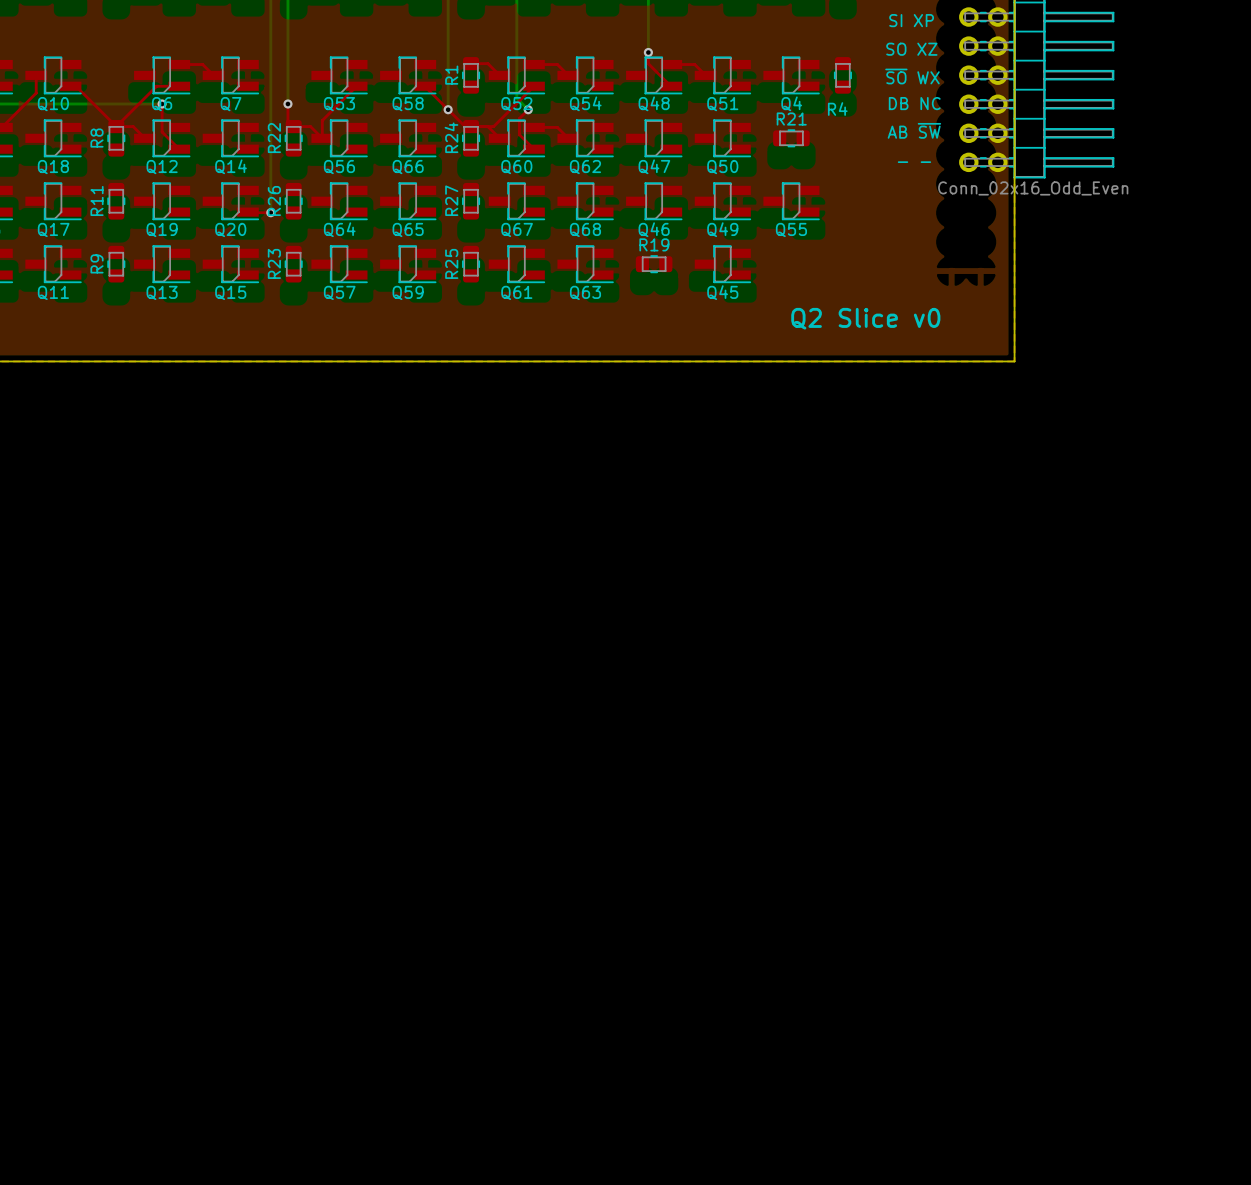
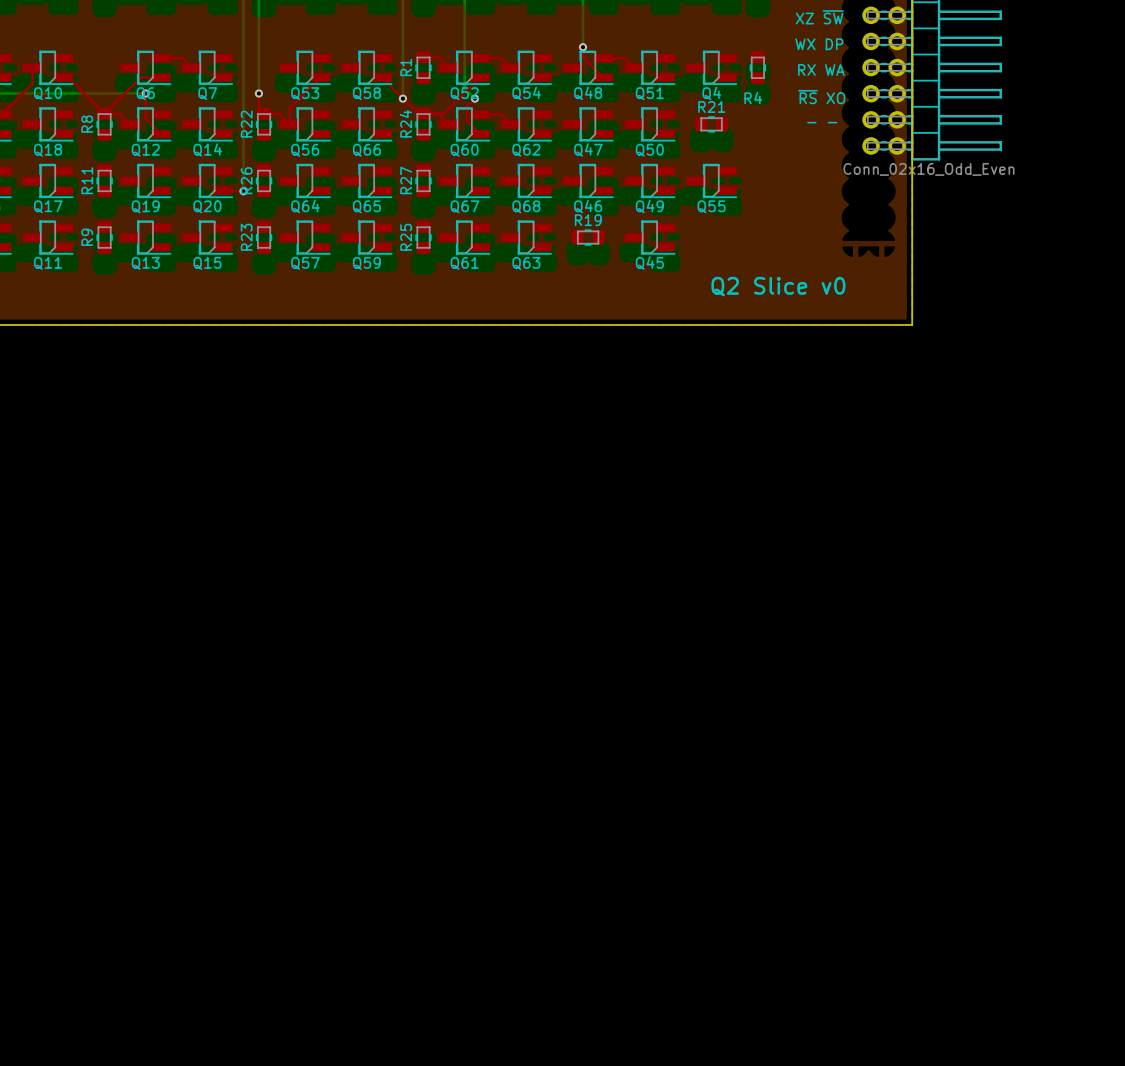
text: SI XP (911, 20) -> XZ ~{SW} (819, 17)
text: SO XZ (911, 49) -> WX DP (819, 44)
text: ~{SO} WX (912, 76) -> RX WA (821, 69)
text: DB NC (914, 103) -> ~{RS} XO (821, 97)
text: AB ~{SW} (914, 130) -> - - (822, 122)
text: - - (914, 162) -> none

